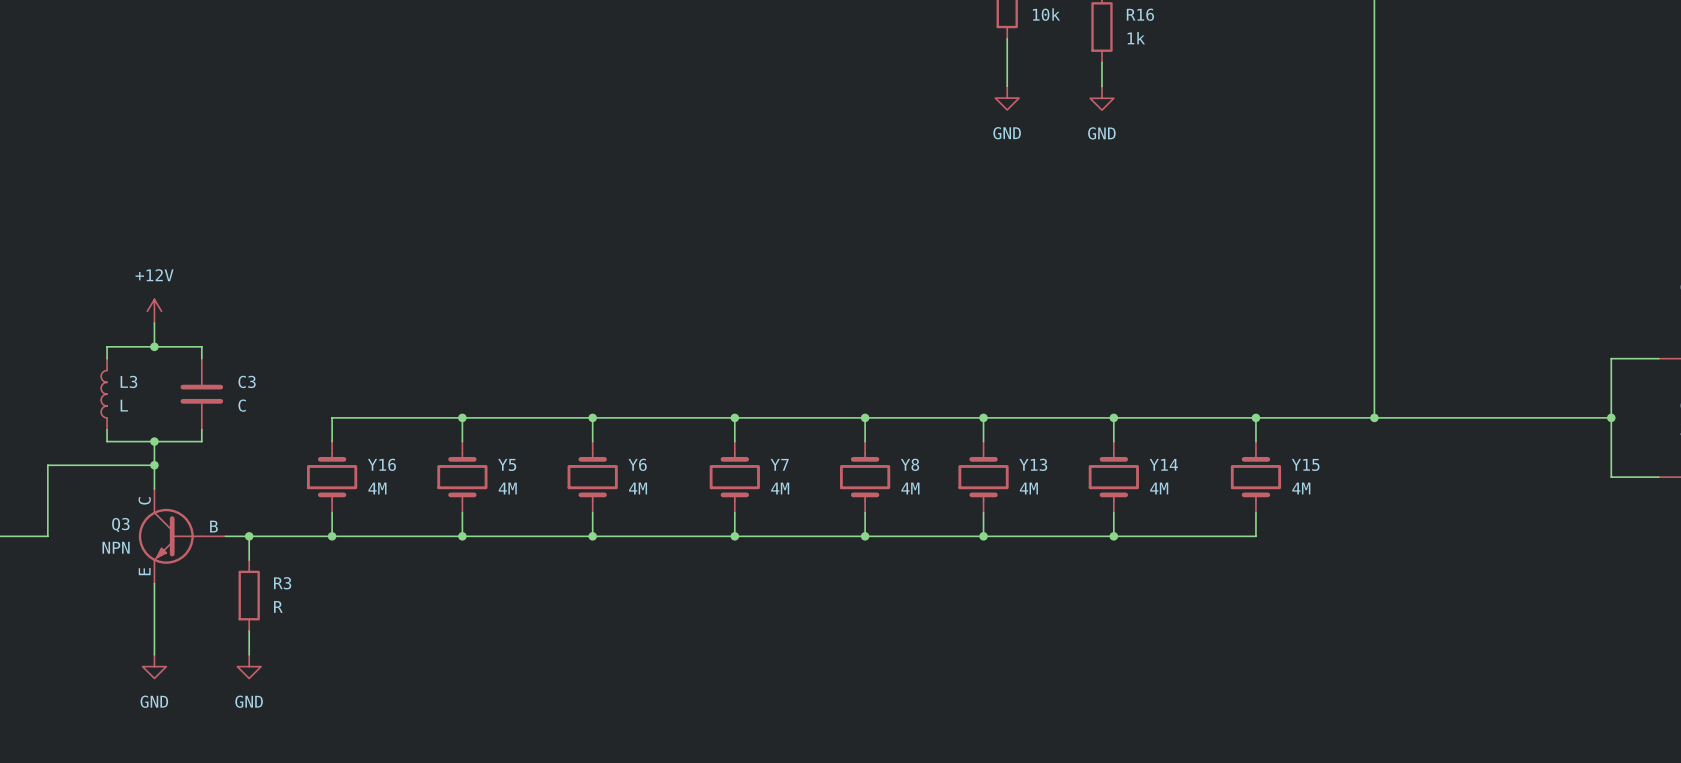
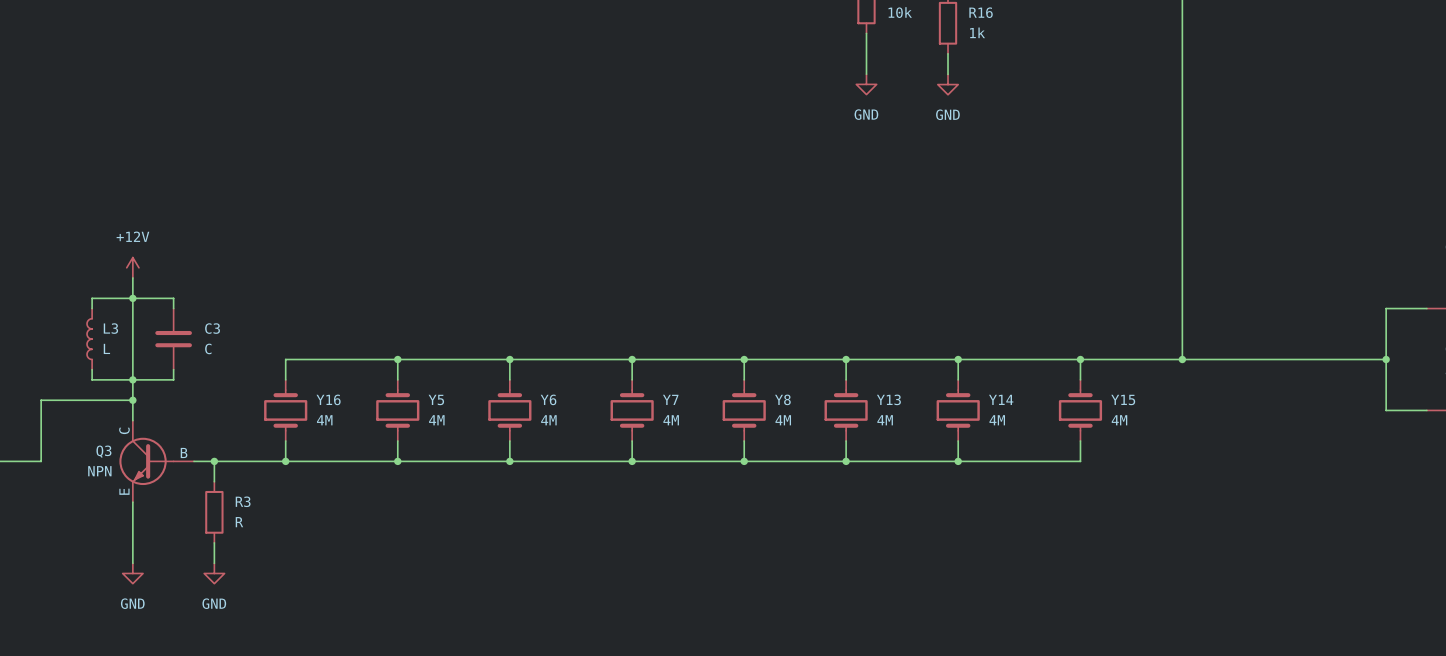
wire: none -> (132, 298) (132, 379)

